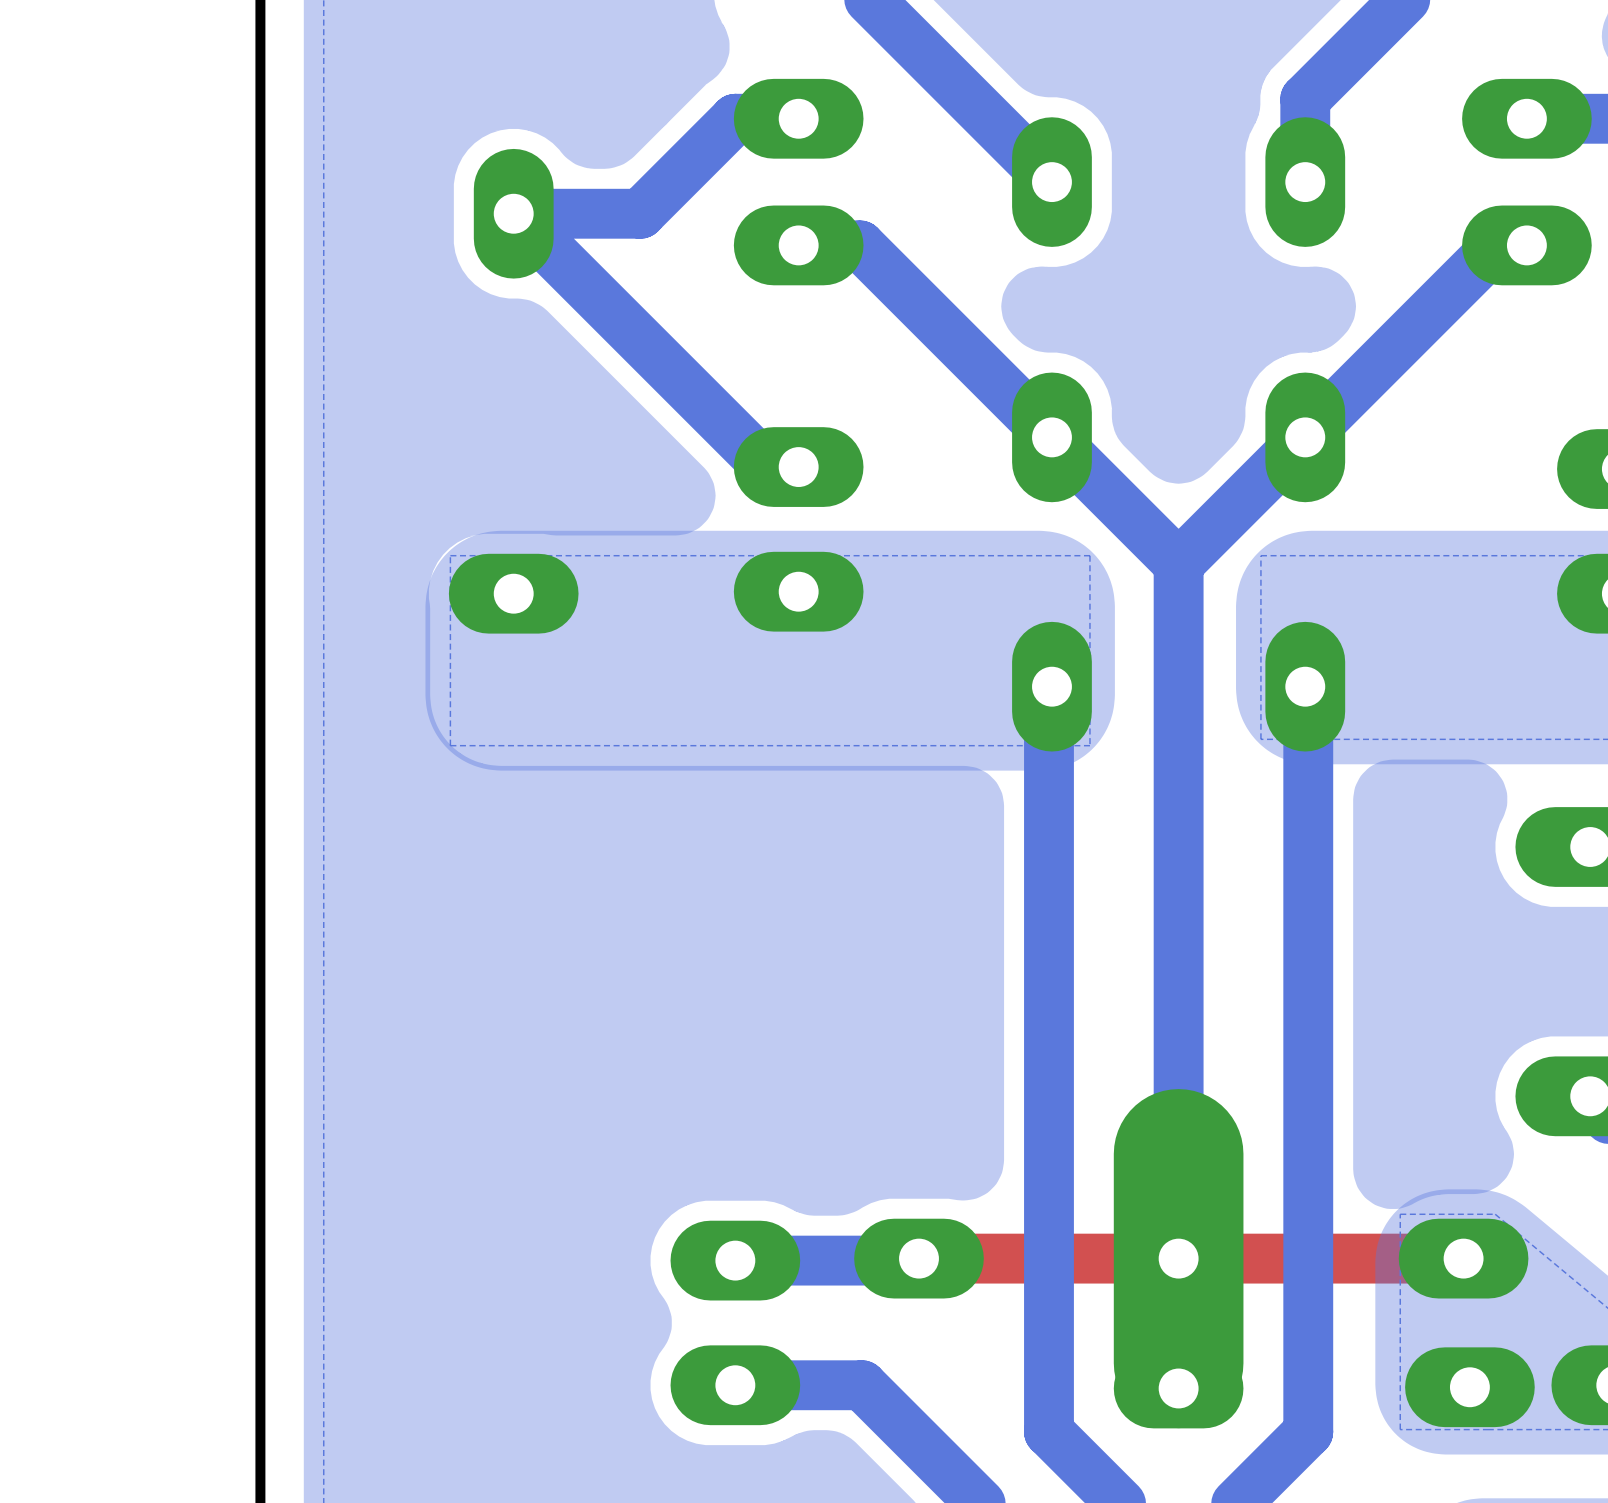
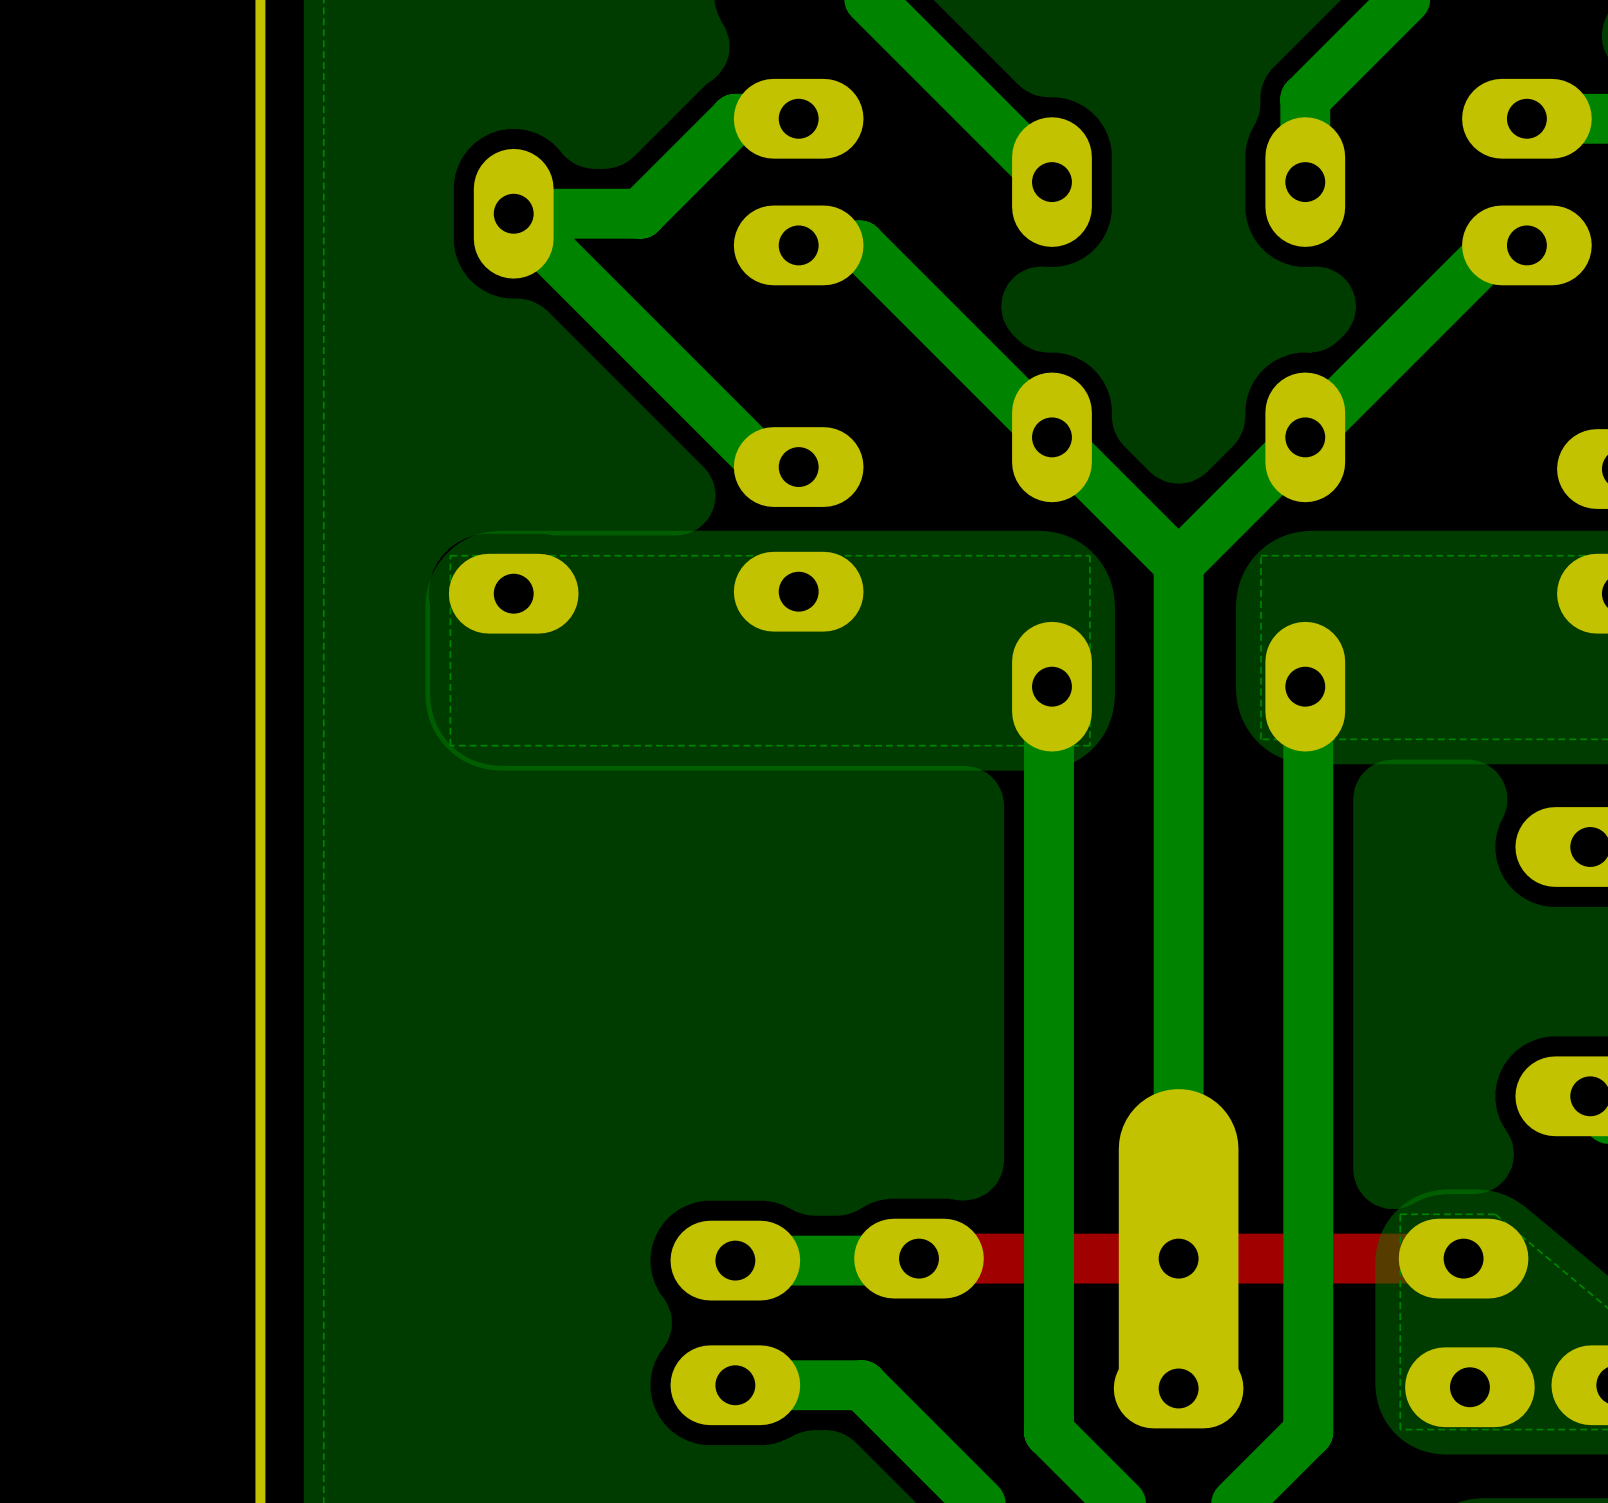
part footprint: [1113, 1089, 1244, 1429] -> [1118, 1089, 1239, 1429]

